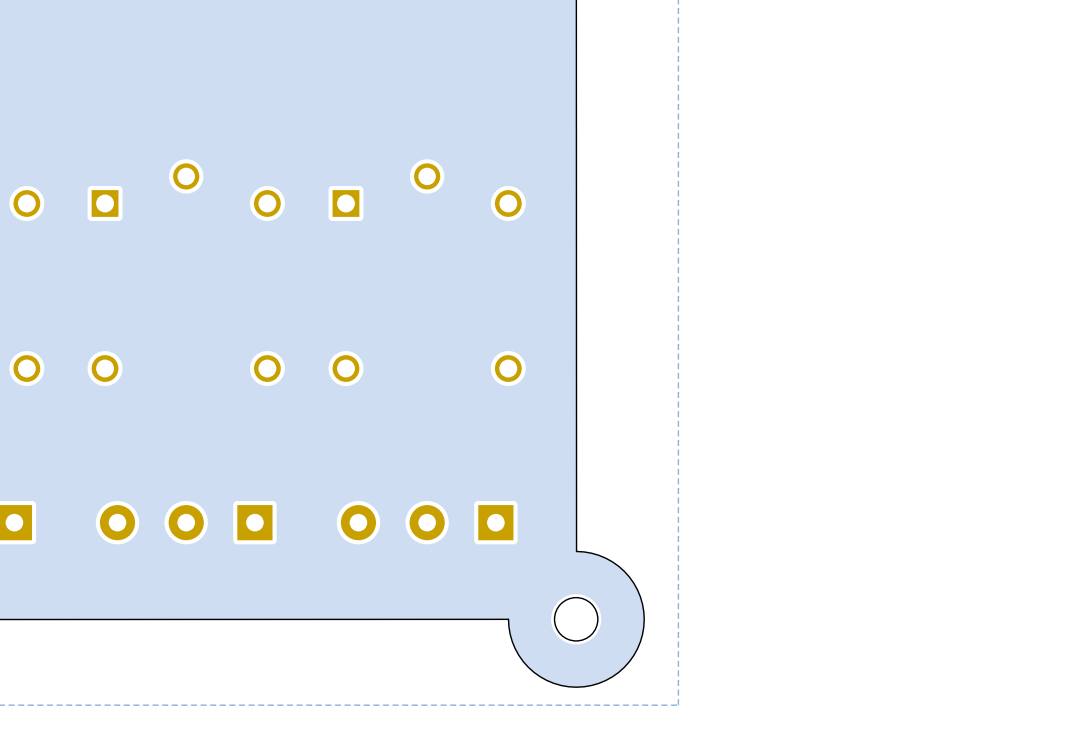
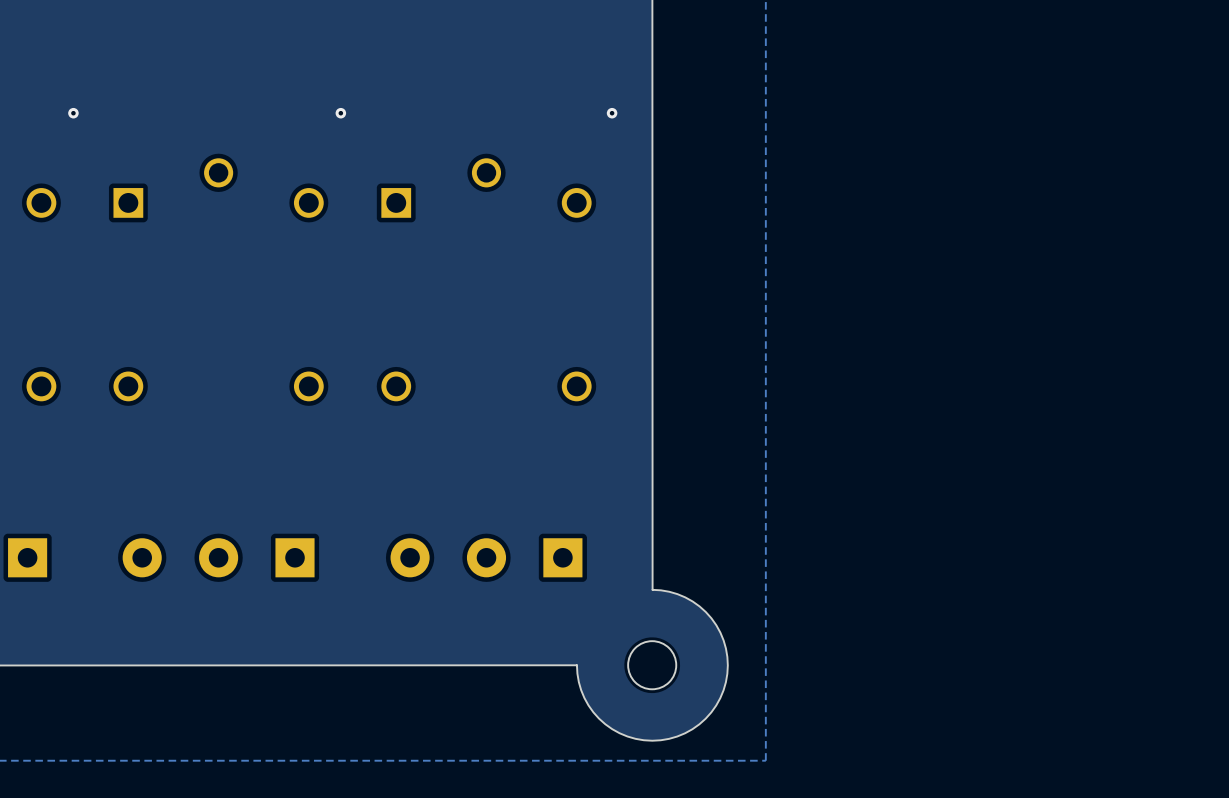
via: none -> (73, 113)
via: none -> (340, 113)
via: none -> (612, 113)

